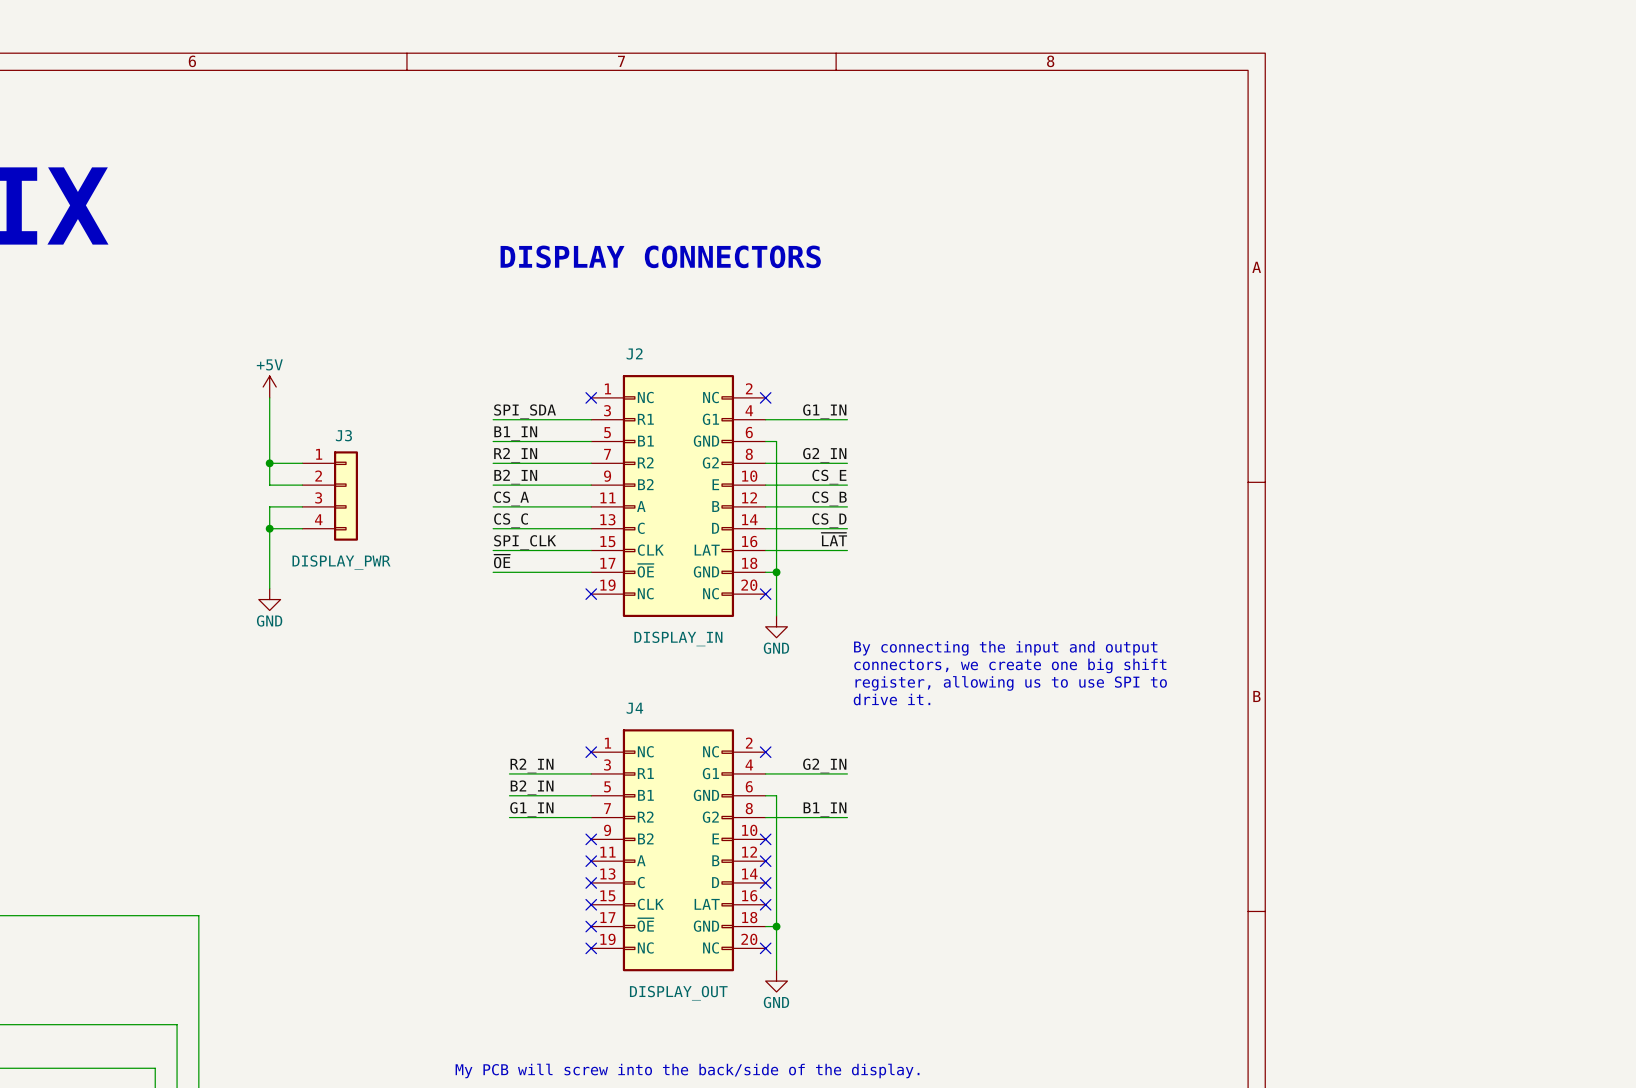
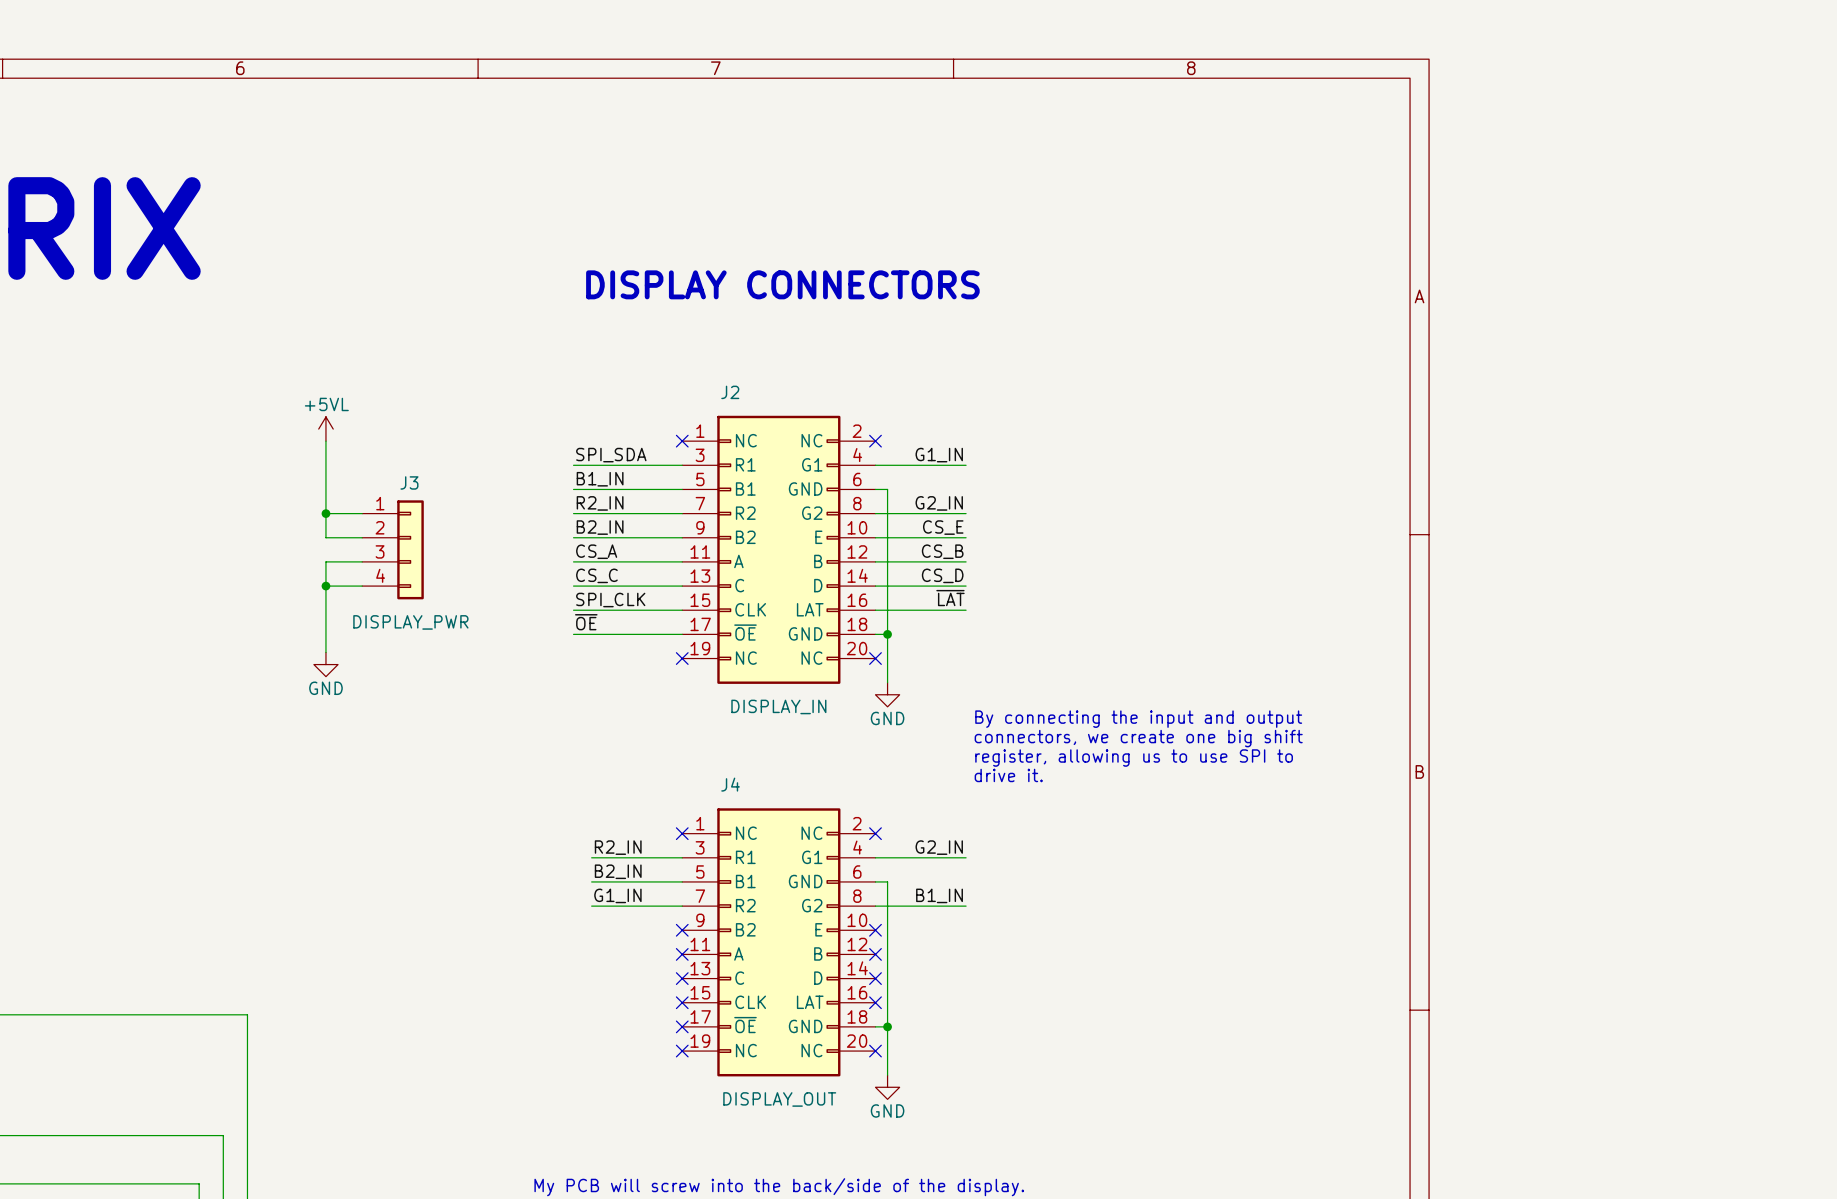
power symbol: +5V (269, 387) -> +5VL (325, 429)

